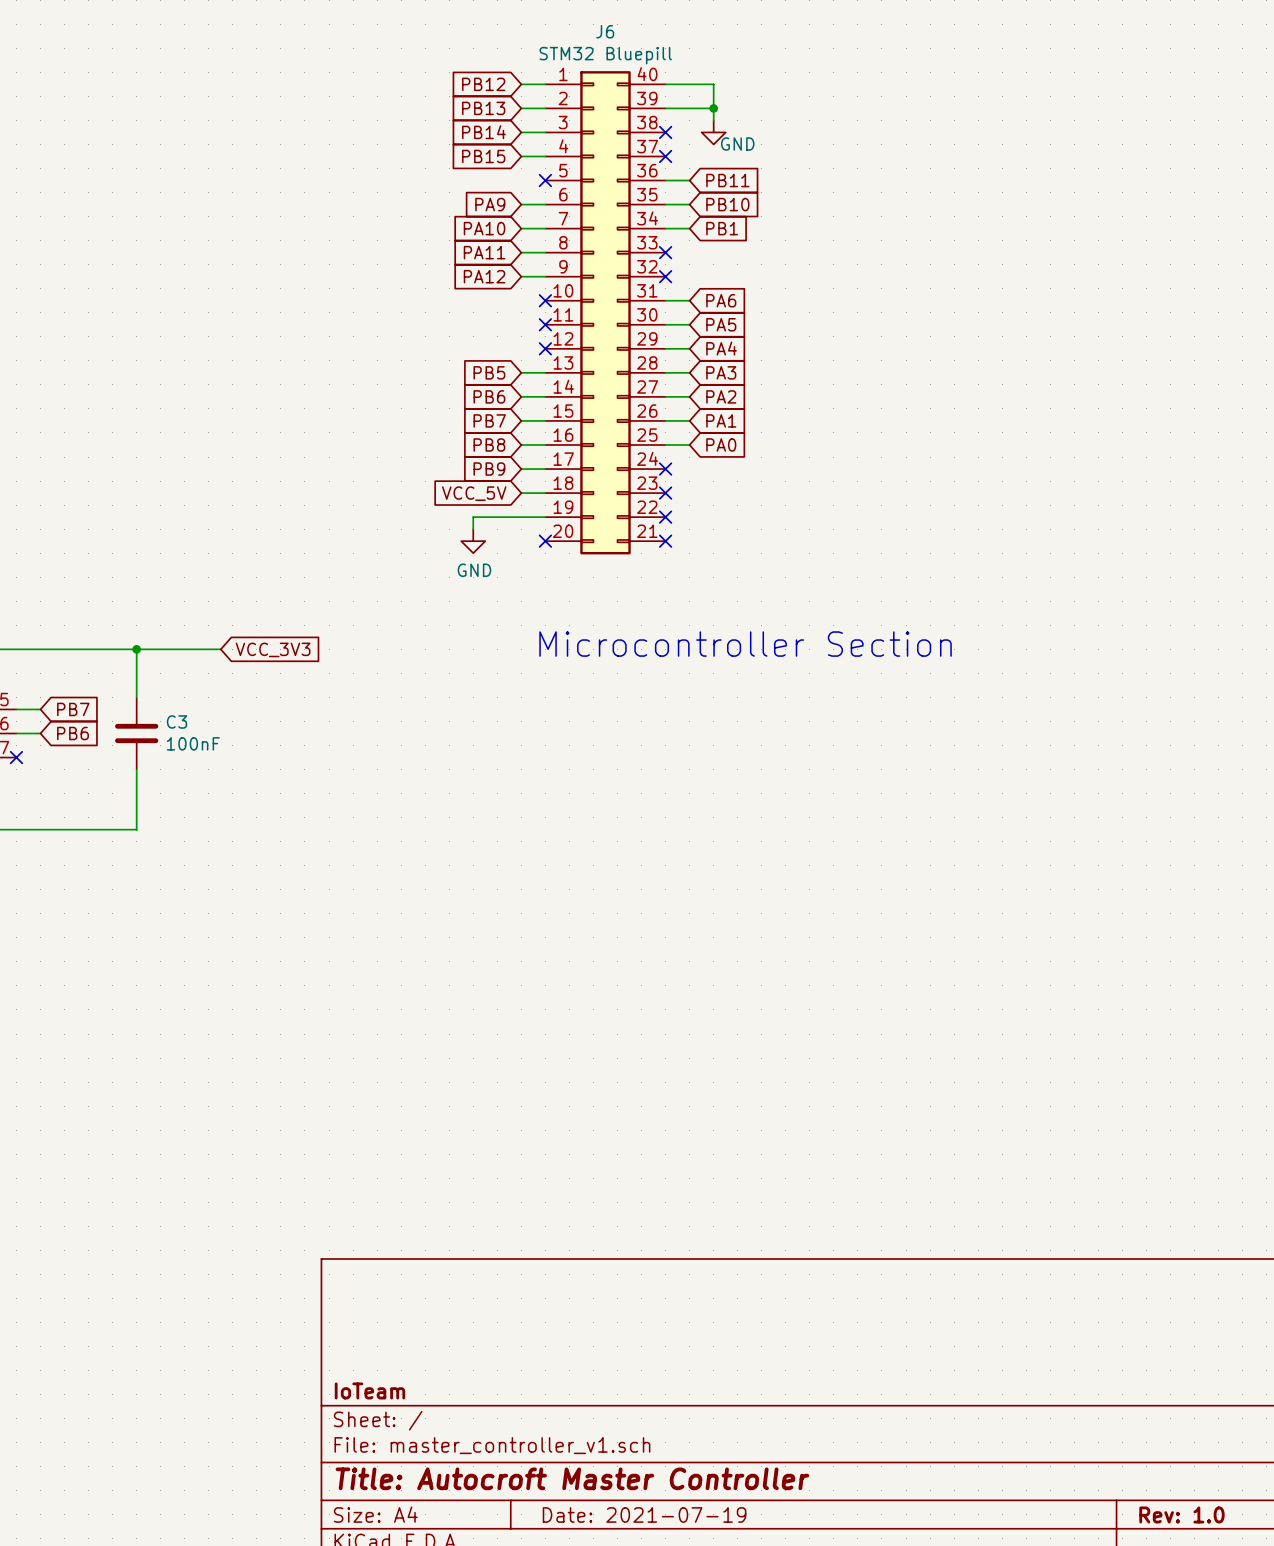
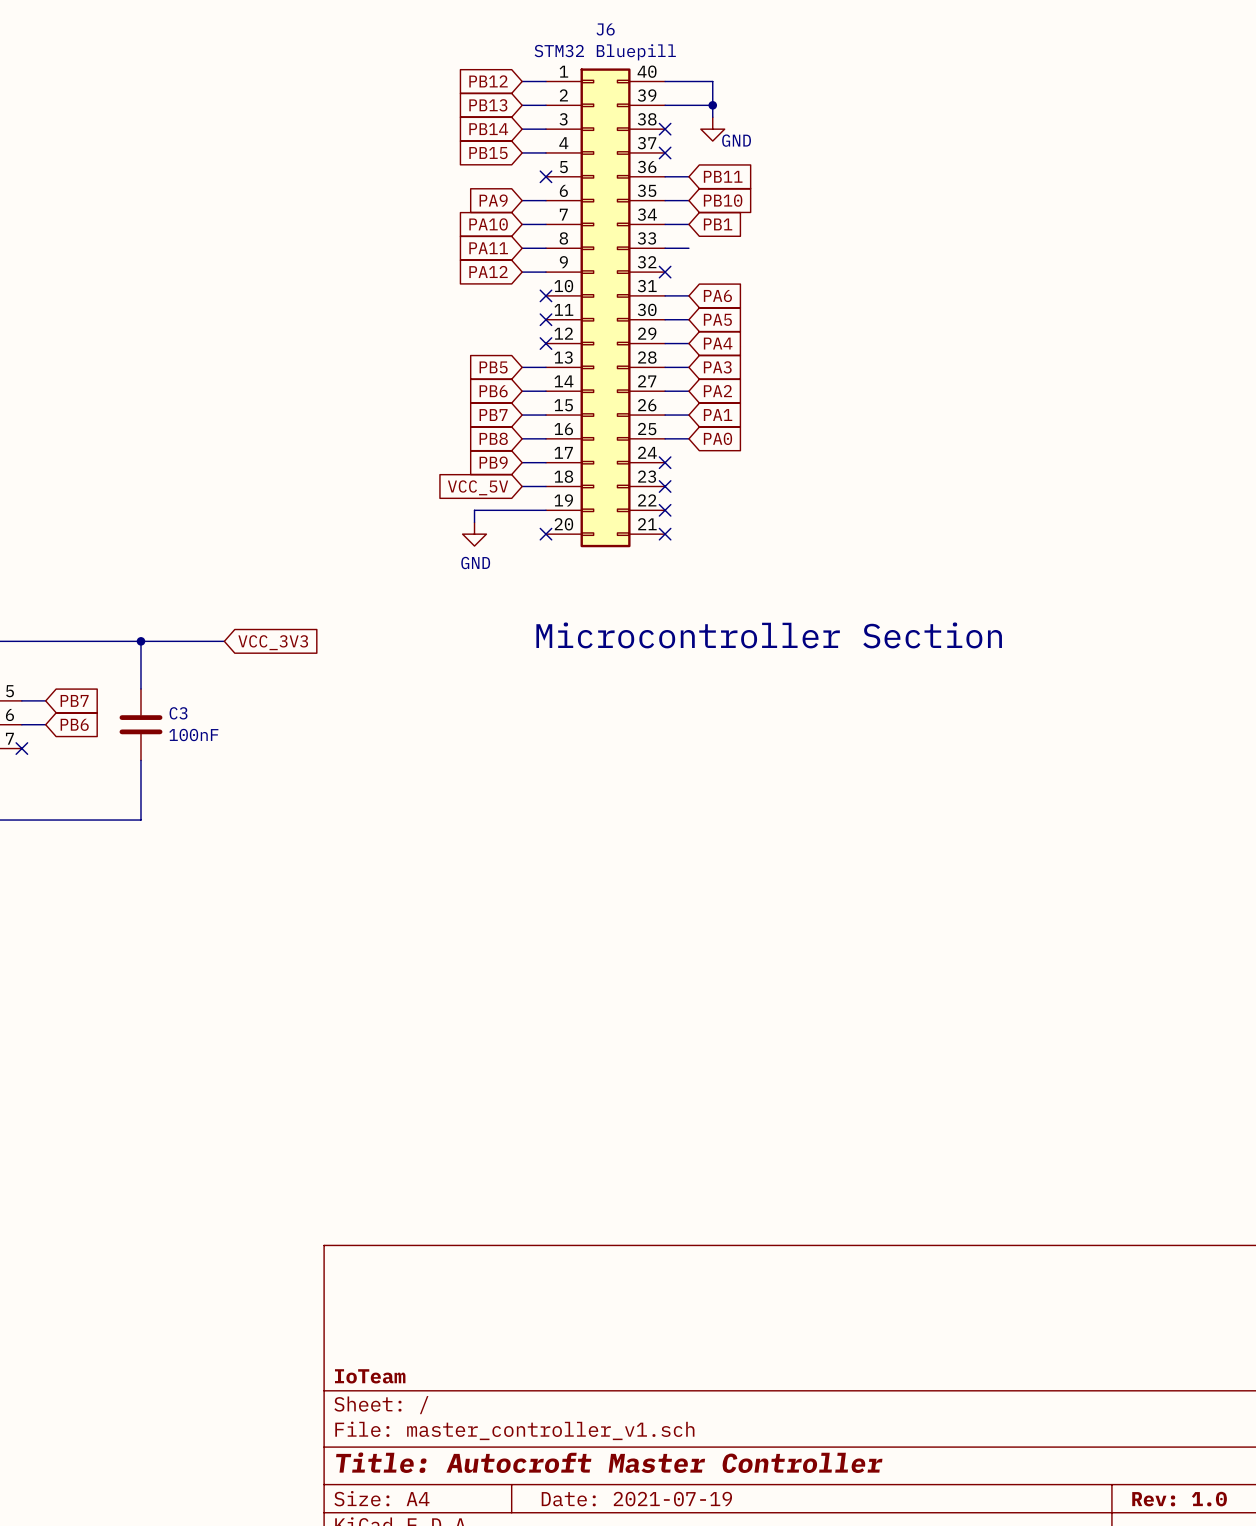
wire: none -> (665, 248) (688, 248)
no-connect mark: (665, 252) -> none

